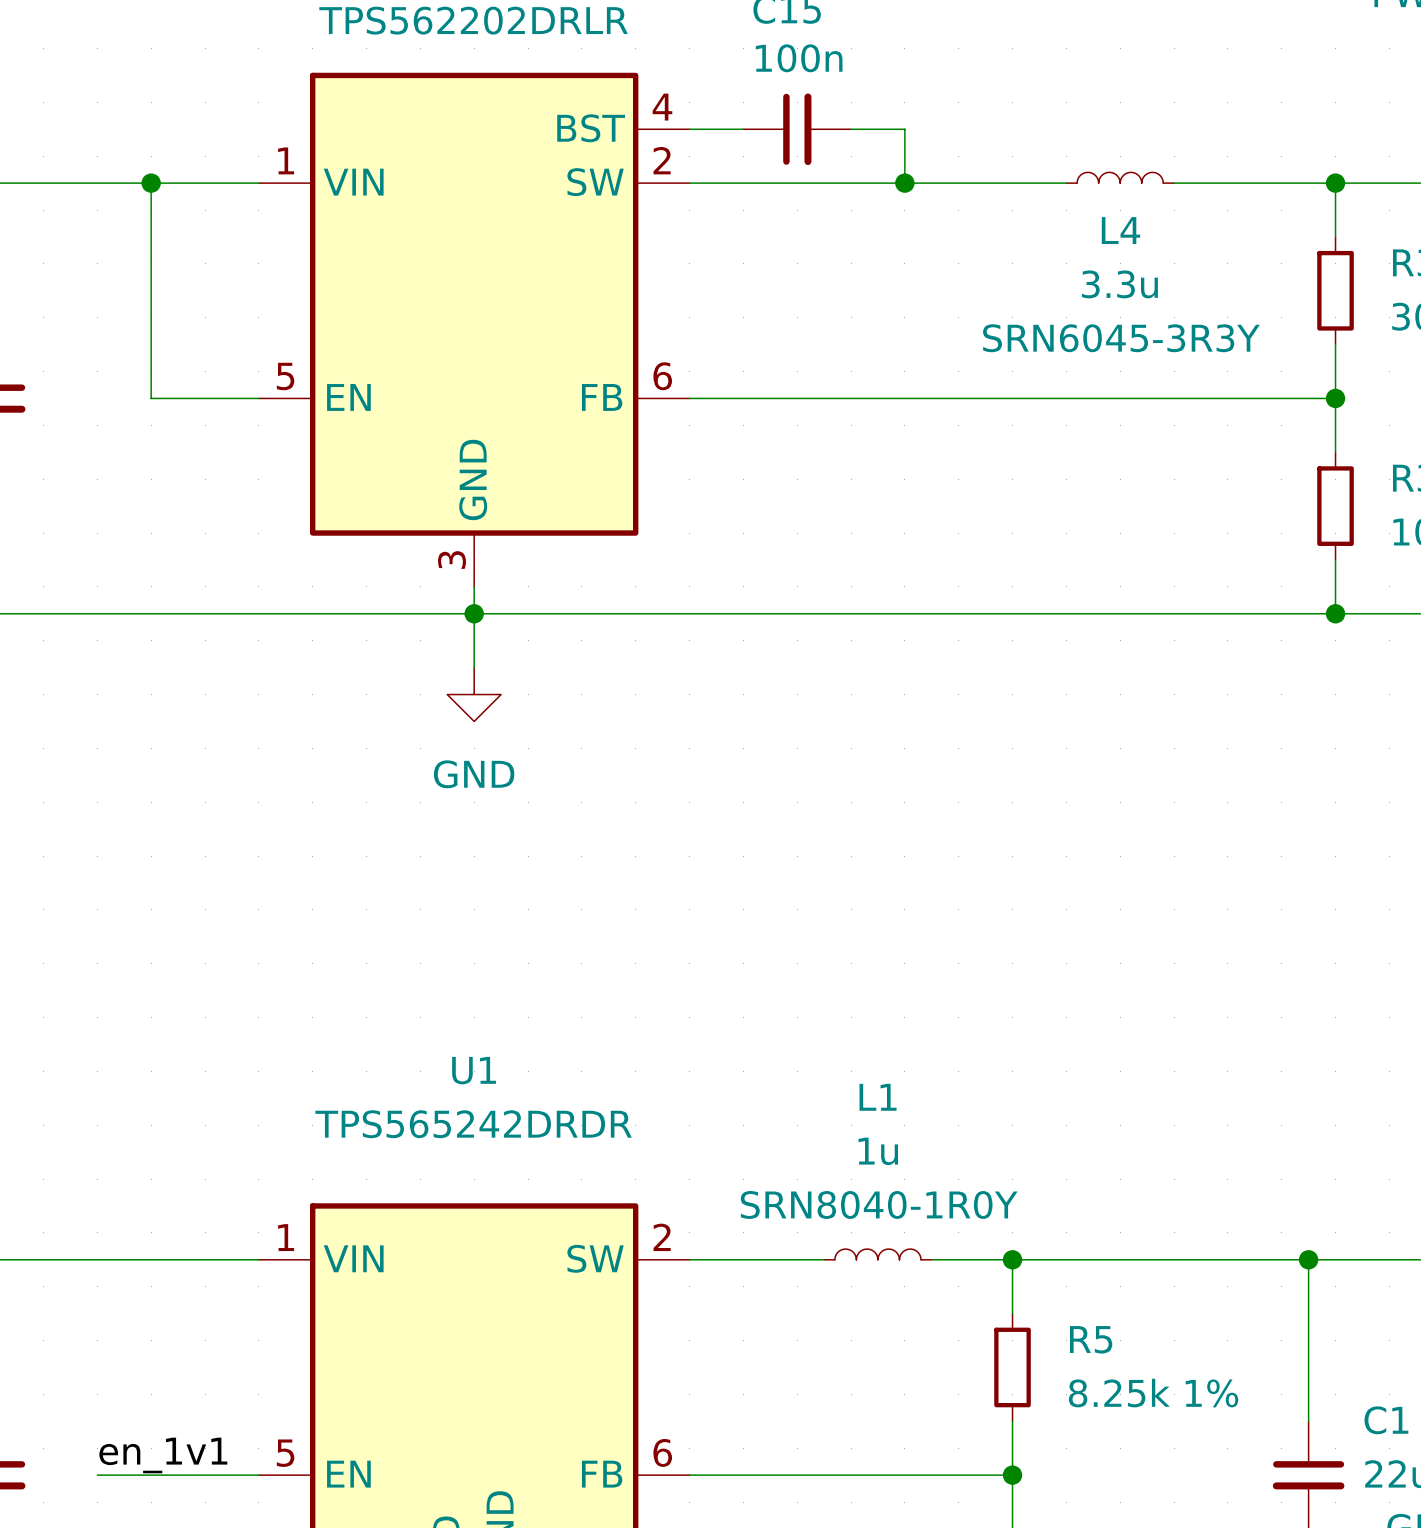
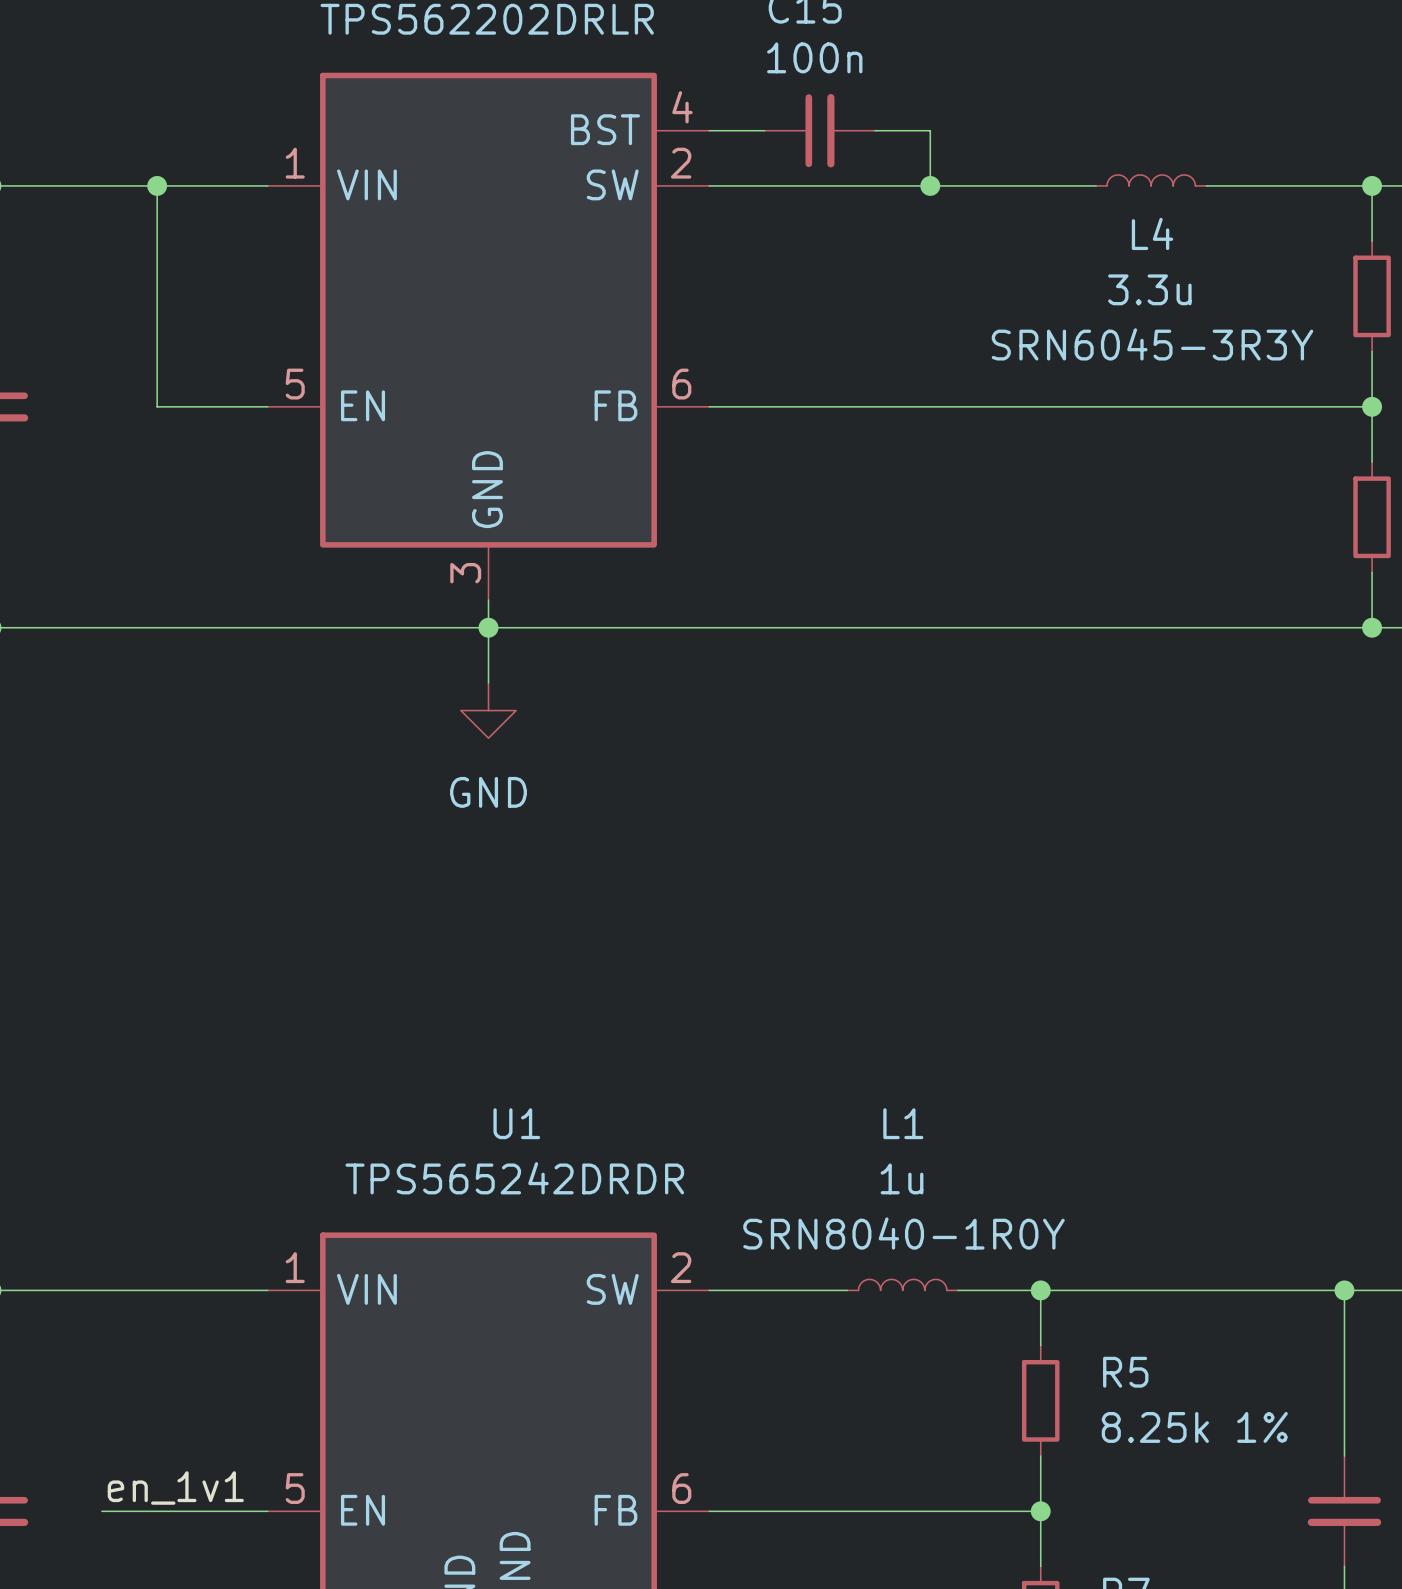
U1 name position: U1 (474, 1070) -> U1 (516, 1123)
U1 value position: TPS565242DRDR (473, 1124) -> TPS565242DRDR (514, 1178)

